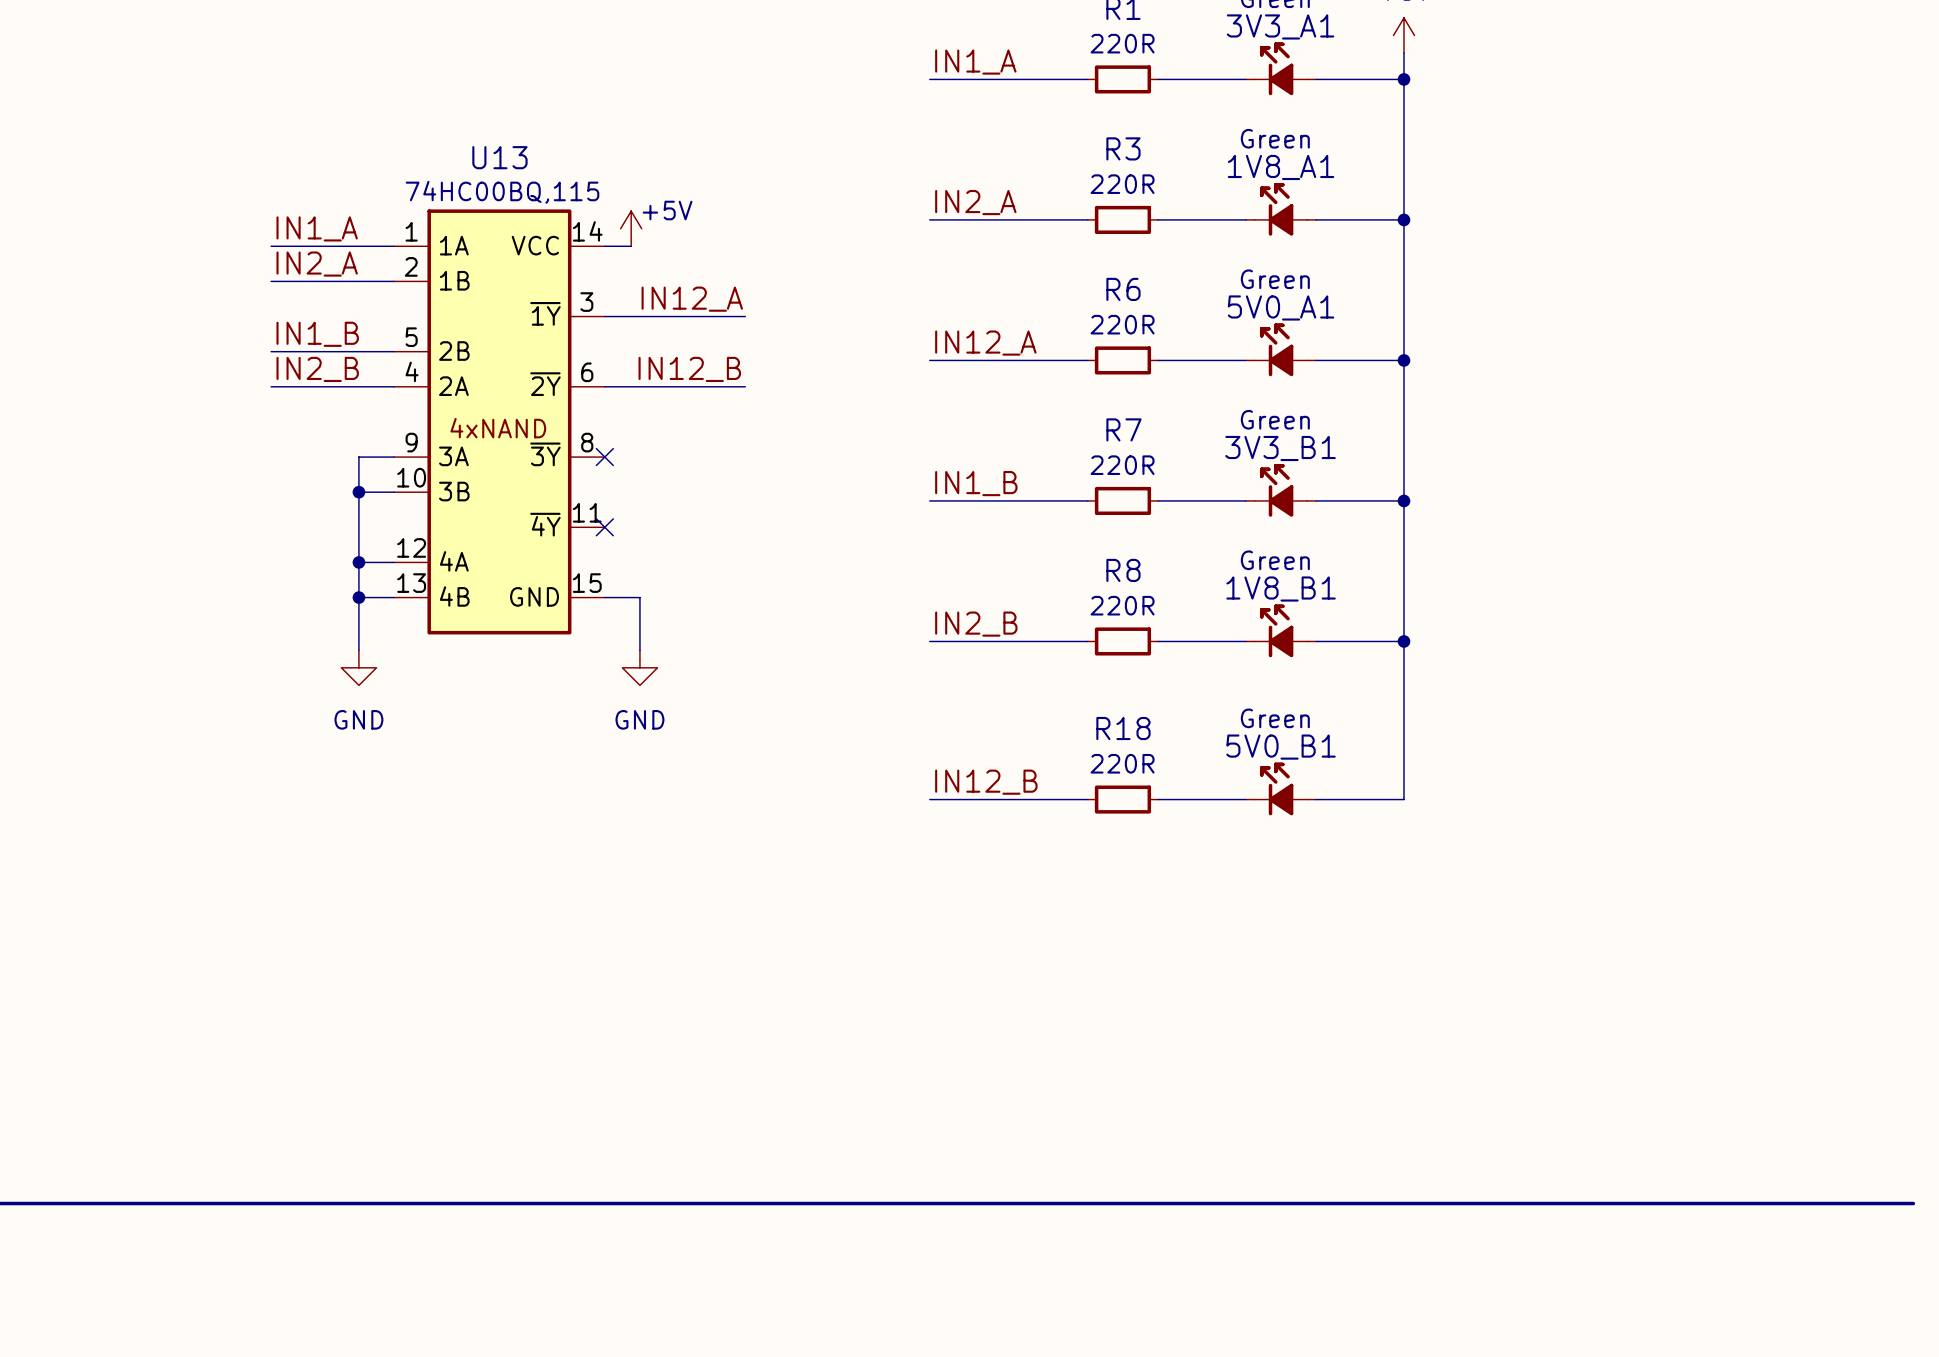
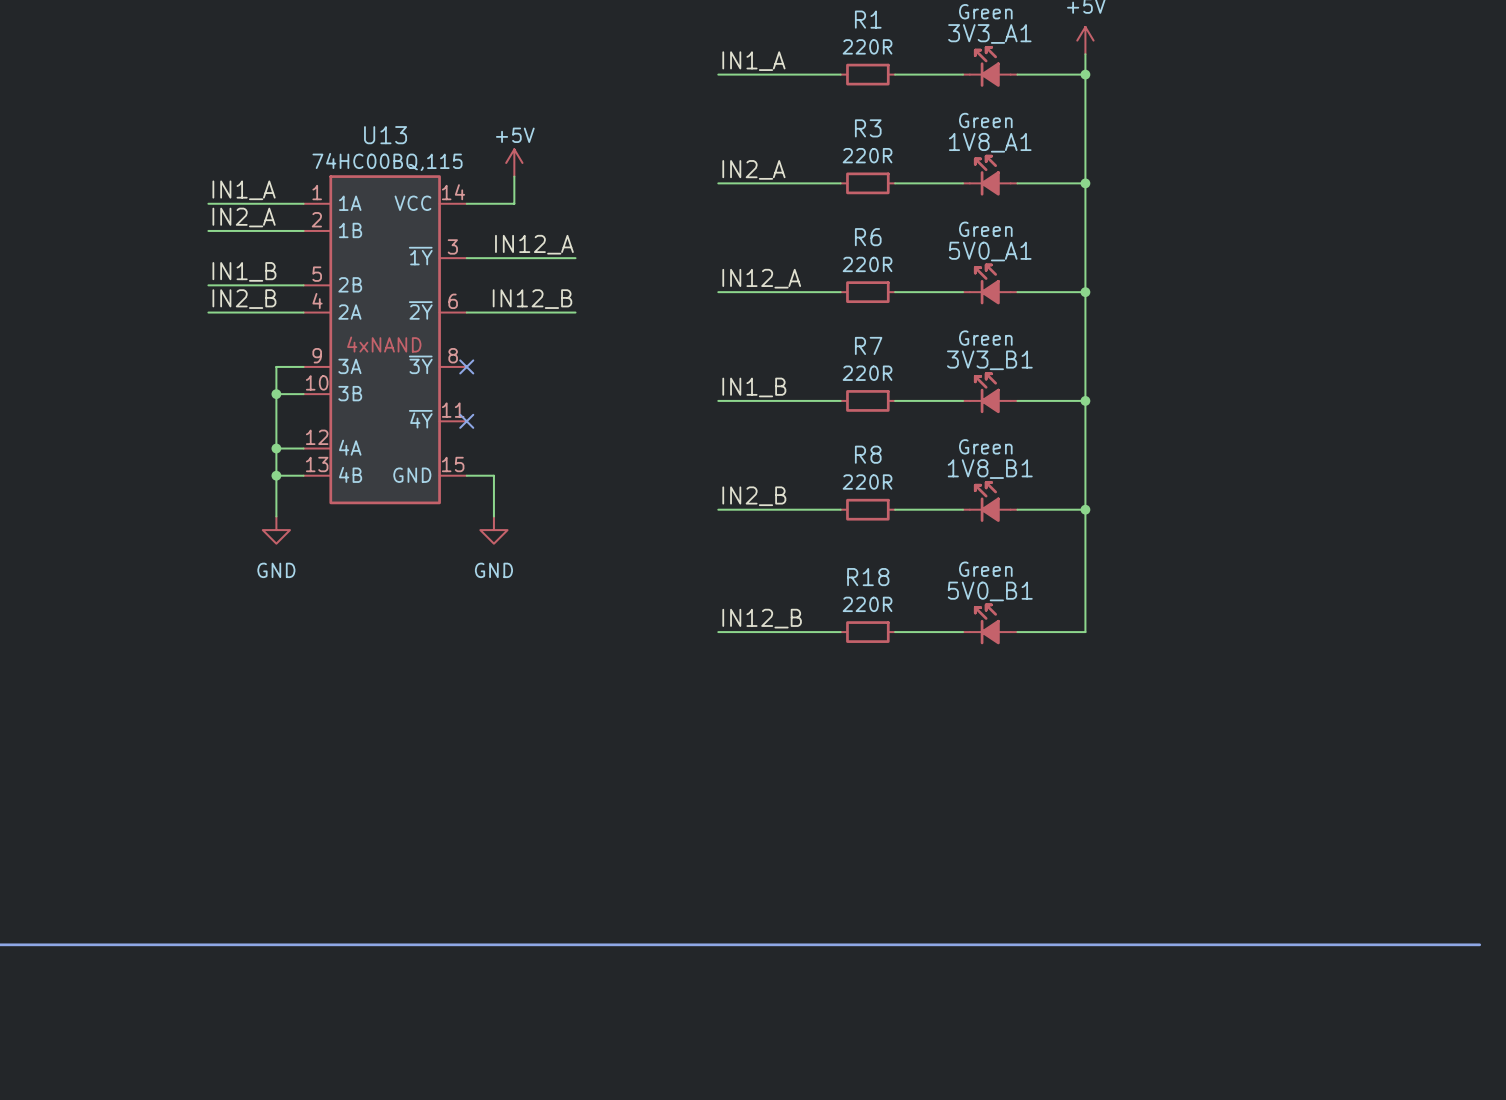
power symbol text position: +5V (667, 210) -> +5V (515, 135)
wire: none -> (514, 176) (514, 203) (487, 203)
power symbol position: +5V (631, 228) -> +5V (514, 162)

